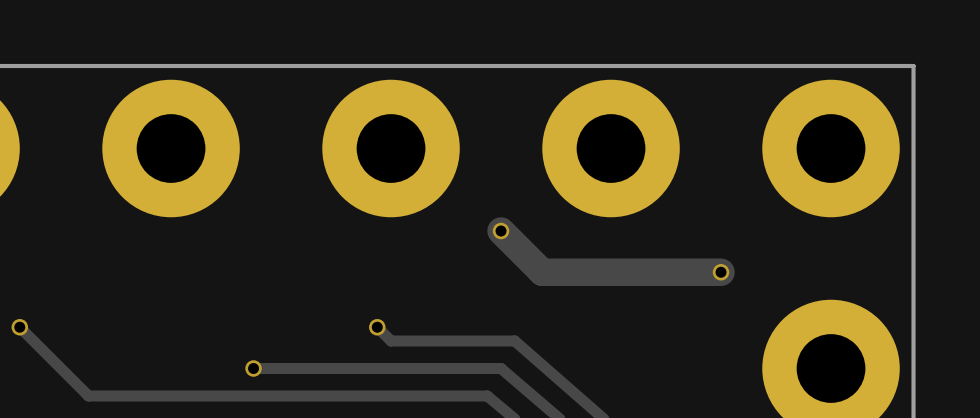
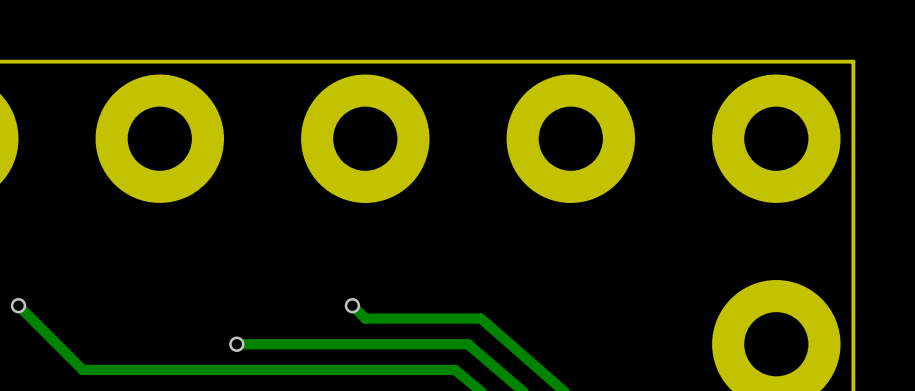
track: (501, 231) (542, 272) (721, 272) -> none
via: (501, 231) -> none
via: (721, 272) -> none

